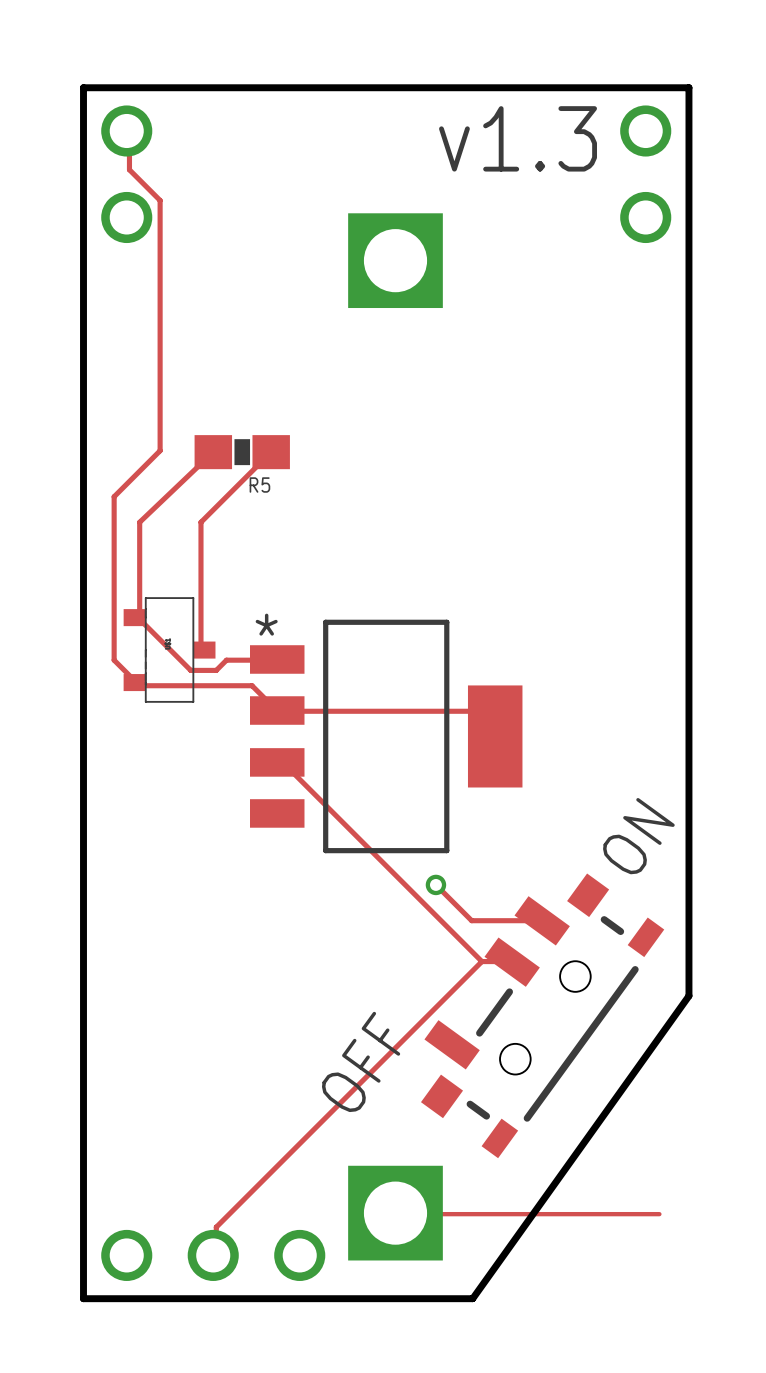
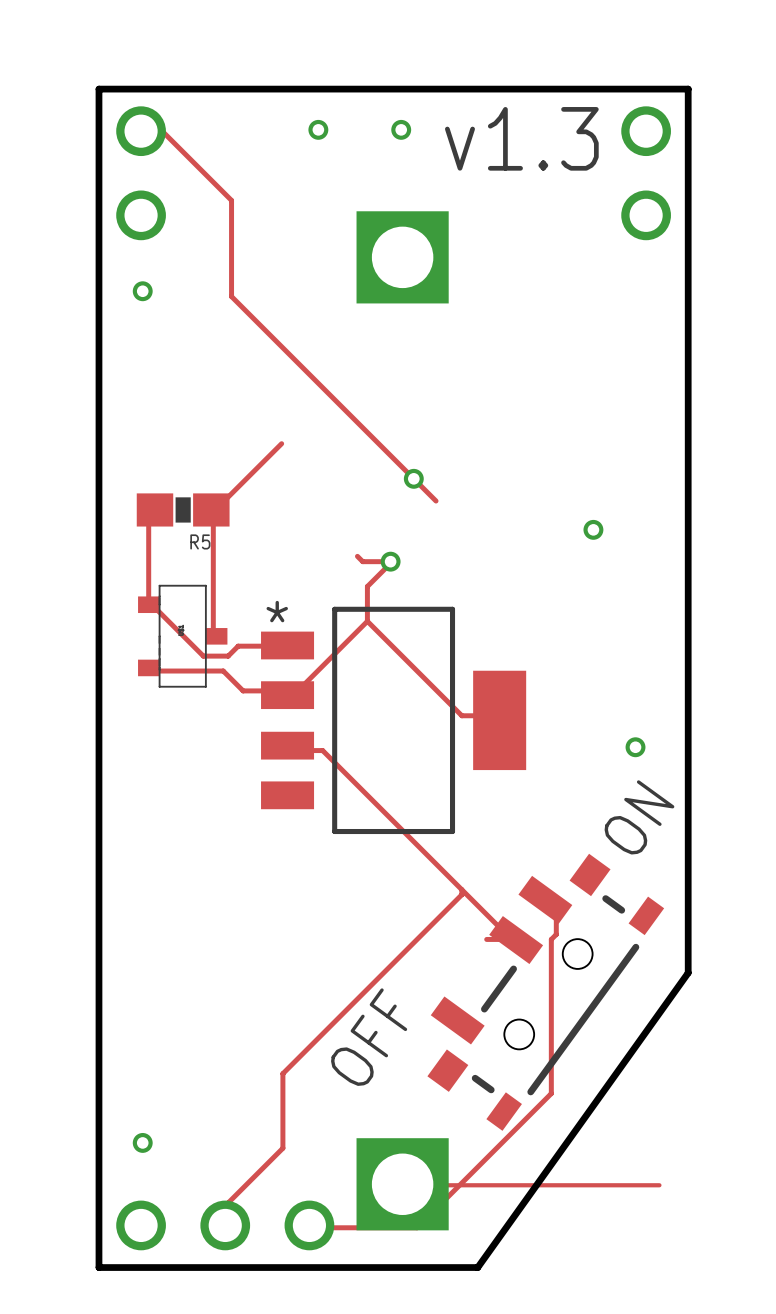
via: none -> (318, 129)
via: none -> (401, 129)
track: (126, 130) (129, 134) (129, 169) (160, 200) (160, 450) (114, 496) (114, 660) (134, 682) -> (141, 131) (162, 131) (231, 200) (231, 296) (436, 501)
via: none -> (142, 291)
track: (213, 452) (139, 522) (139, 614) (134, 617) -> (154, 509) (148, 516) (148, 604)
R5 position: (242, 452) -> (183, 509)
via: none -> (413, 478)
via: none -> (593, 529)
track: none -> (357, 556) (362, 561) (392, 561) (367, 586) (367, 621)
via: none -> (390, 561)
track: none -> (367, 621) (297, 690) (287, 690) (287, 695)
track: (211, 685) (252, 685) (272, 706) -> (223, 671) (243, 690) (282, 690)
track: (277, 710) (471, 711) (492, 731) -> (367, 621) (461, 715) (496, 715)
via: none -> (635, 747)
track: (287, 767) (481, 961) (216, 1227) (216, 1232) -> (461, 889) (461, 894) (282, 1073) (282, 1148) (228, 1202)
track: none -> (297, 750) (322, 750) (511, 939)
track: (435, 884) (471, 920) (542, 920) -> (309, 1225) (312, 1227) (417, 1227) (551, 1093) (551, 939) (556, 934) (556, 914) (546, 904) (545, 899)
via: (435, 884) -> none
via: none -> (142, 1142)

